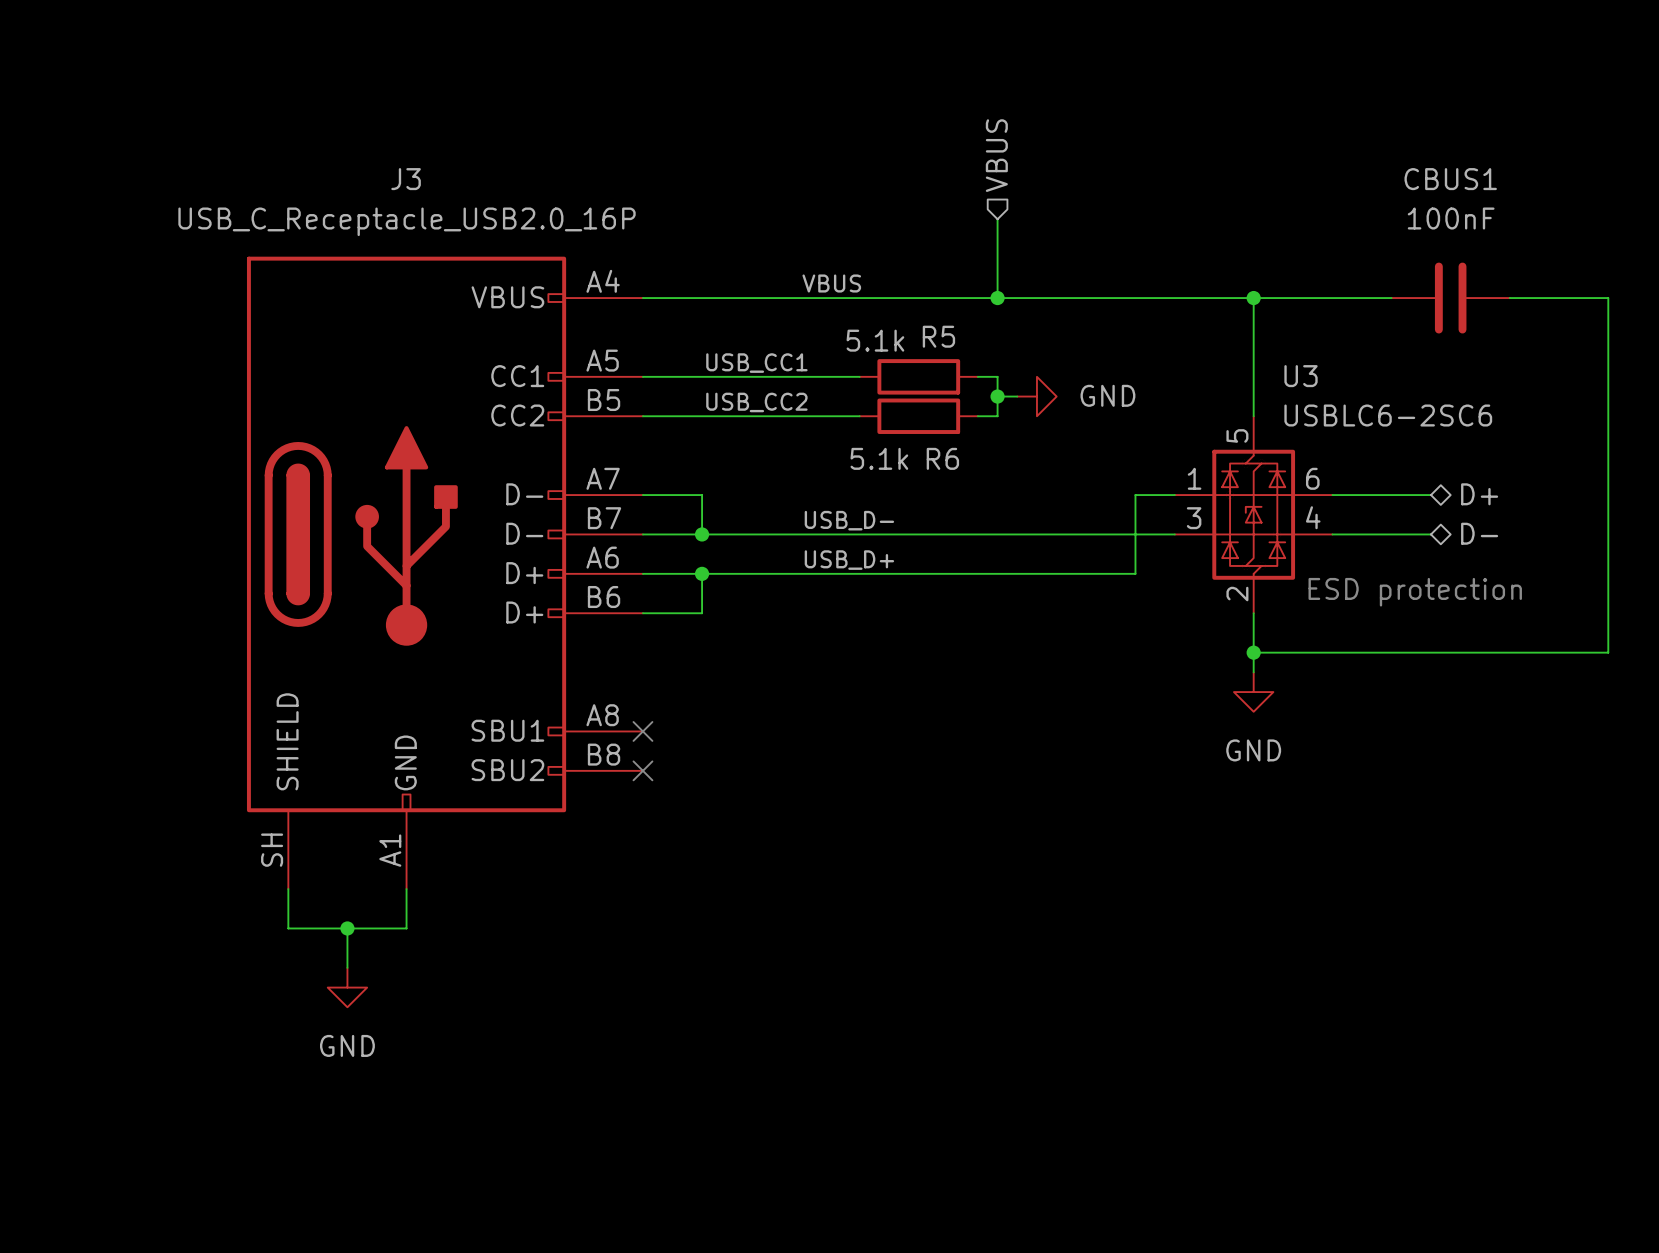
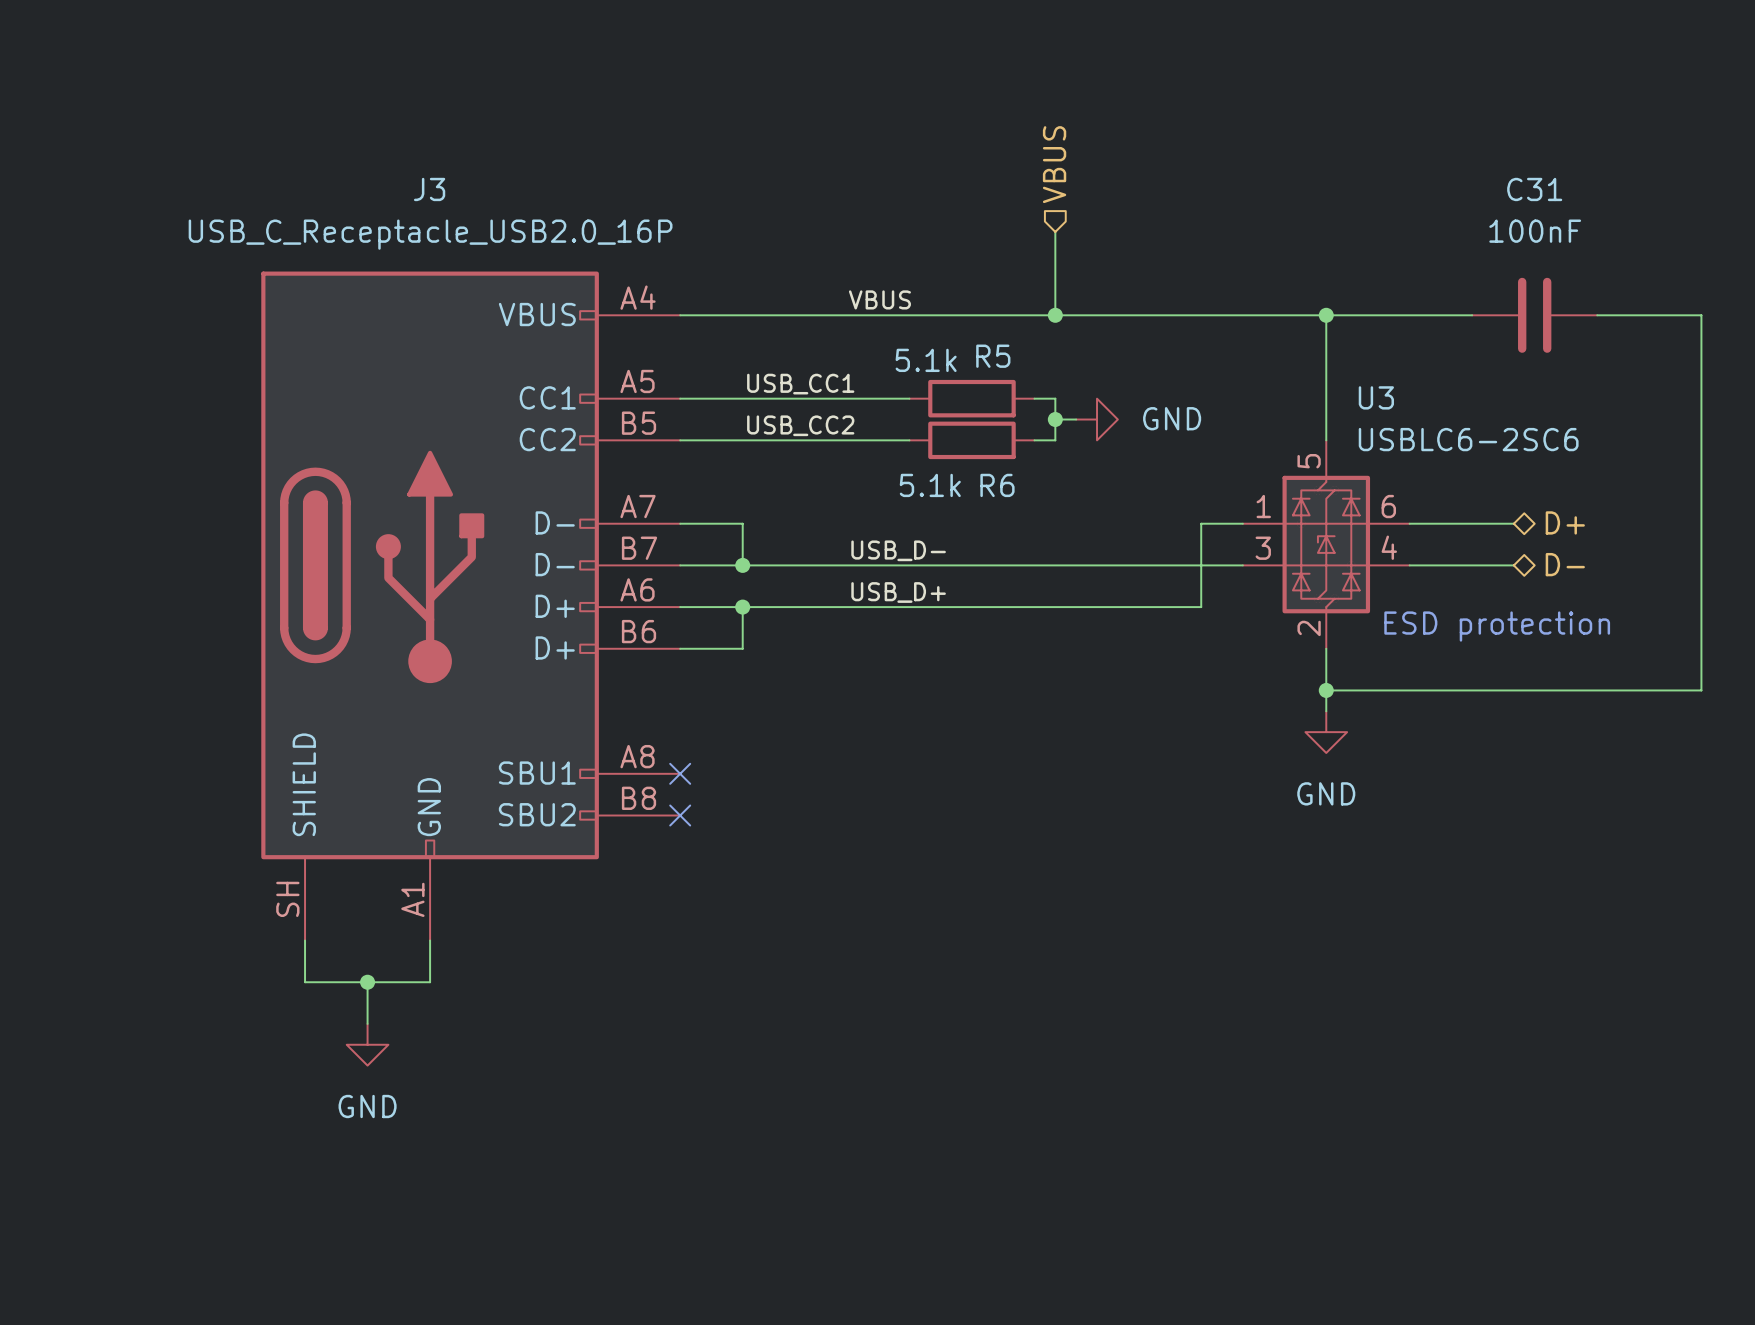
CBUS1 name: CBUS1 (1450, 179) -> C31 (1534, 189)

